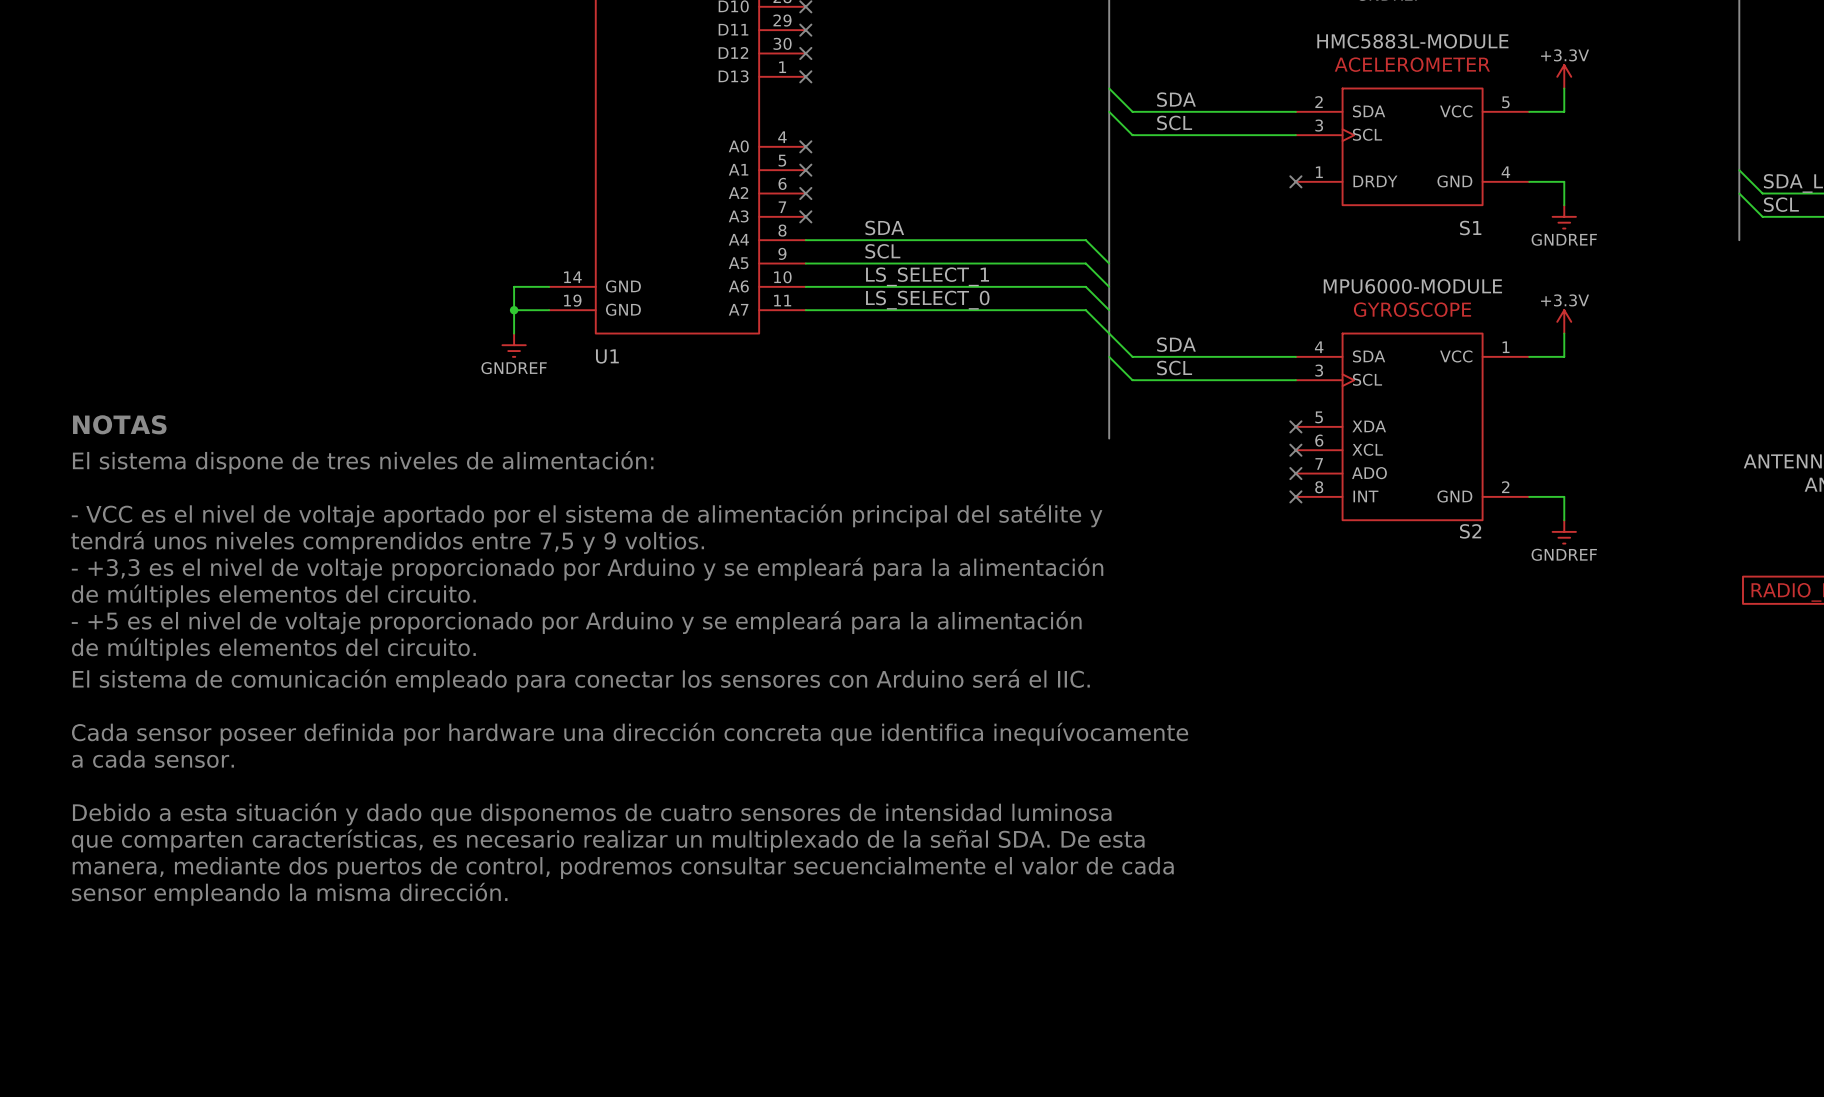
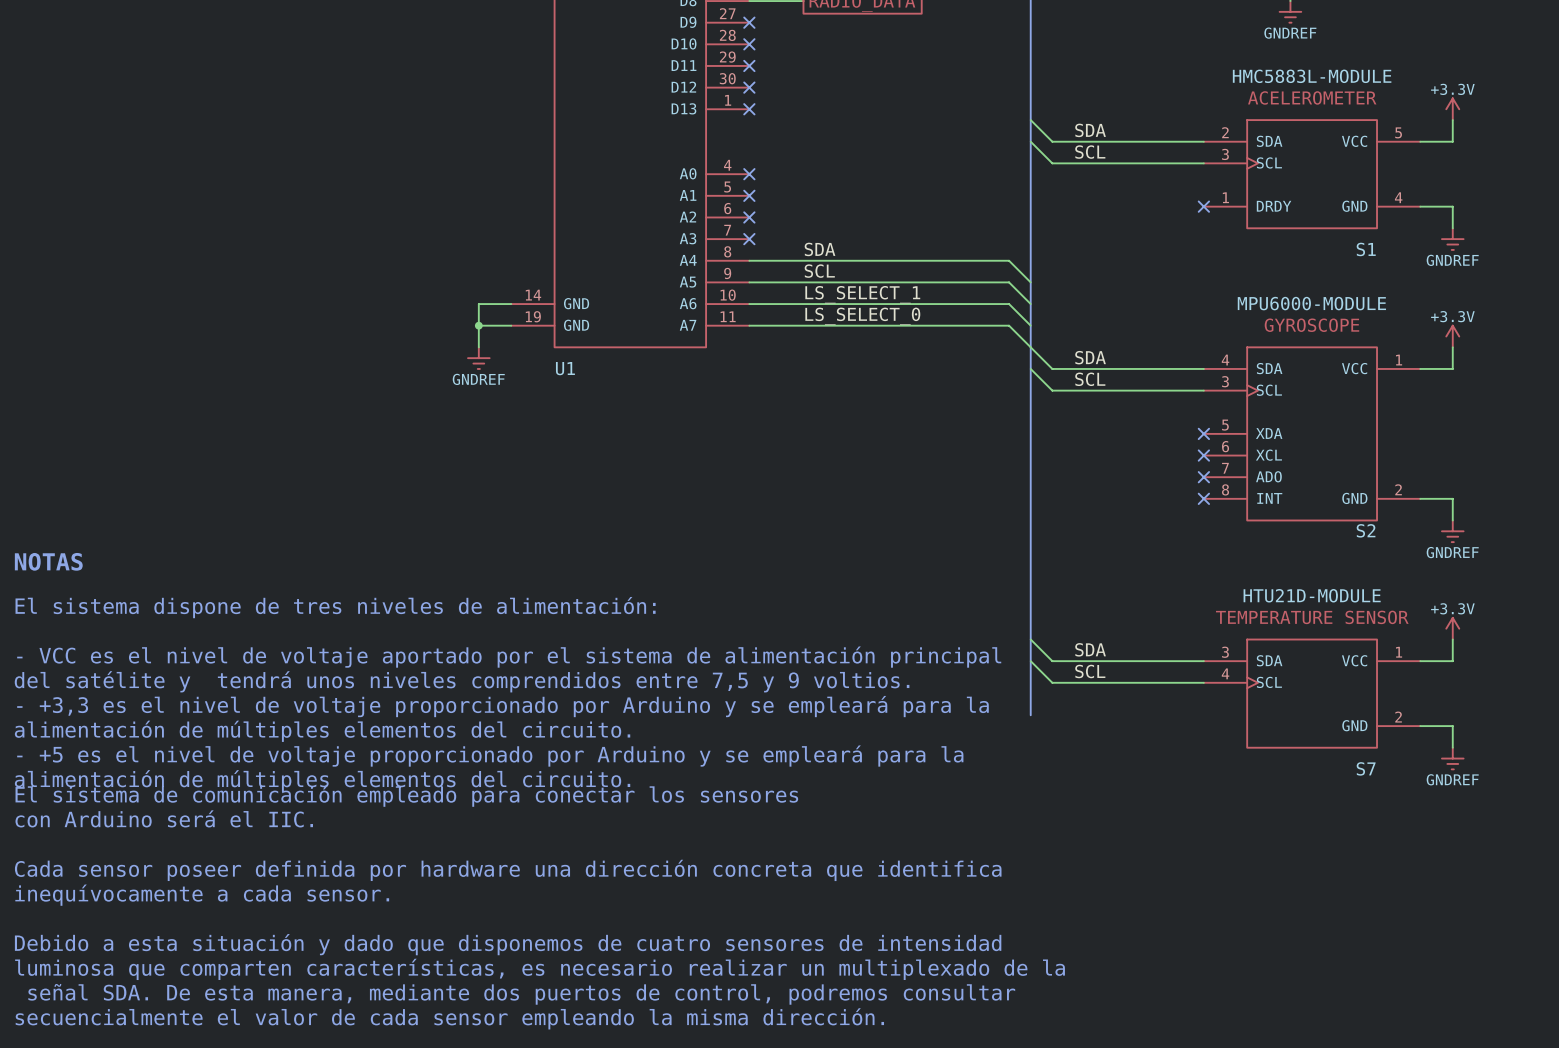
text position: NOTAS (119, 424) -> NOTAS (48, 561)
bus: none -> (1030, 444) (1030, 715)
text position: El sistema dispone de tres niveles de alimentación: (363, 462) -> El sistema dispone de tres niveles de alimentación: (335, 607)
text: - VCC es el nivel de voltaje aportado por el sistema de alimentación principal del satélite y (587, 515) -> none
text: tendrá unos niveles comprendidos entre 7,5 y 9 voltios. (387, 542) -> none
text: - +3,3 es el nivel de voltaje proporcionado por Arduino y se empleará para la alimentación (587, 569) -> none
text: de múltiples elementos del circuito. (273, 595) -> none
text: - +5 es el nivel de voltaje proporcionado por Arduino y se empleará para la alimentación (576, 622) -> none
power symbol: none -> +3.3V (1452, 628)
wire: none -> (1030, 639) (1052, 661) (1203, 661)
wire: none -> (1452, 639) (1452, 661) (1420, 661)
text: de múltiples elementos del circuito. (273, 649) -> none
label: none -> SDA (1090, 649)
text: none -> - VCC es el nivel de voltaje aportado por el sistema de alimentación principal (509, 657)
wire: none -> (1030, 661) (1052, 682) (1203, 682)
text: El sistema de comunicación empleado para conectar los sensores con Arduino será el IIC. (581, 680) -> none
label: none -> SCL (1090, 671)
text: none -> del satélite y tendrá unos niveles comprendidos entre 7,5 y 9 voltios. (462, 681)
S7: none -> HTU21D-MODULE (1312, 693)
text: none -> - +3,3 es el nivel de voltaje proporcionado por Arduino y se empleará para la (502, 706)
text: Cada sensor poseer definida por hardware una dirección concreta que identifica inequívocamente (630, 734) -> none
wire: none -> (1420, 726) (1452, 726) (1452, 747)
text: none -> alimentación de múltiples elementos del circuito. (322, 731)
text: a cada sensor. (152, 759) -> none
text: none -> - +5 es el nivel de voltaje proporcionado por Arduino y se empleará para la (490, 756)
power symbol: none -> GNDREF (1452, 758)
text: none -> alimentación de múltiples elementos del circuito. (322, 780)
text: Debido a esta situación y dado que disponemos de cuatro sensores de intensidad luminosa (592, 814) -> none
text: none -> El sistema de comunicación empleado para conectar los sensores (406, 796)
text: que comparten características, es necesario realizar un multiplexado de la señal SDA. De esta (608, 840) -> none
text: none -> con Arduino será el IIC. (164, 818)
text: manera, mediante dos puertos de control, podremos consultar secuencialmente el valor de cada (623, 868) -> none
text: sensor empleando la misma dirección. (289, 894) -> none
text: none -> Cada sensor poseer definida por hardware una dirección concreta que identifica (508, 870)
text: none -> inequívocamente a cada sensor. (202, 895)
text: none -> Debido a esta situación y dado que disponemos de cuatro sensores de intensidad (508, 944)
text: none -> luminosa que comparten características, es necesario realizar un multiplexado de la (540, 969)
text: none -> señal SDA. De esta manera, mediante dos puertos de control, podremos consultar (521, 994)
text: none -> secuencialmente el valor de cada sensor empleando la misma dirección. (449, 1018)

